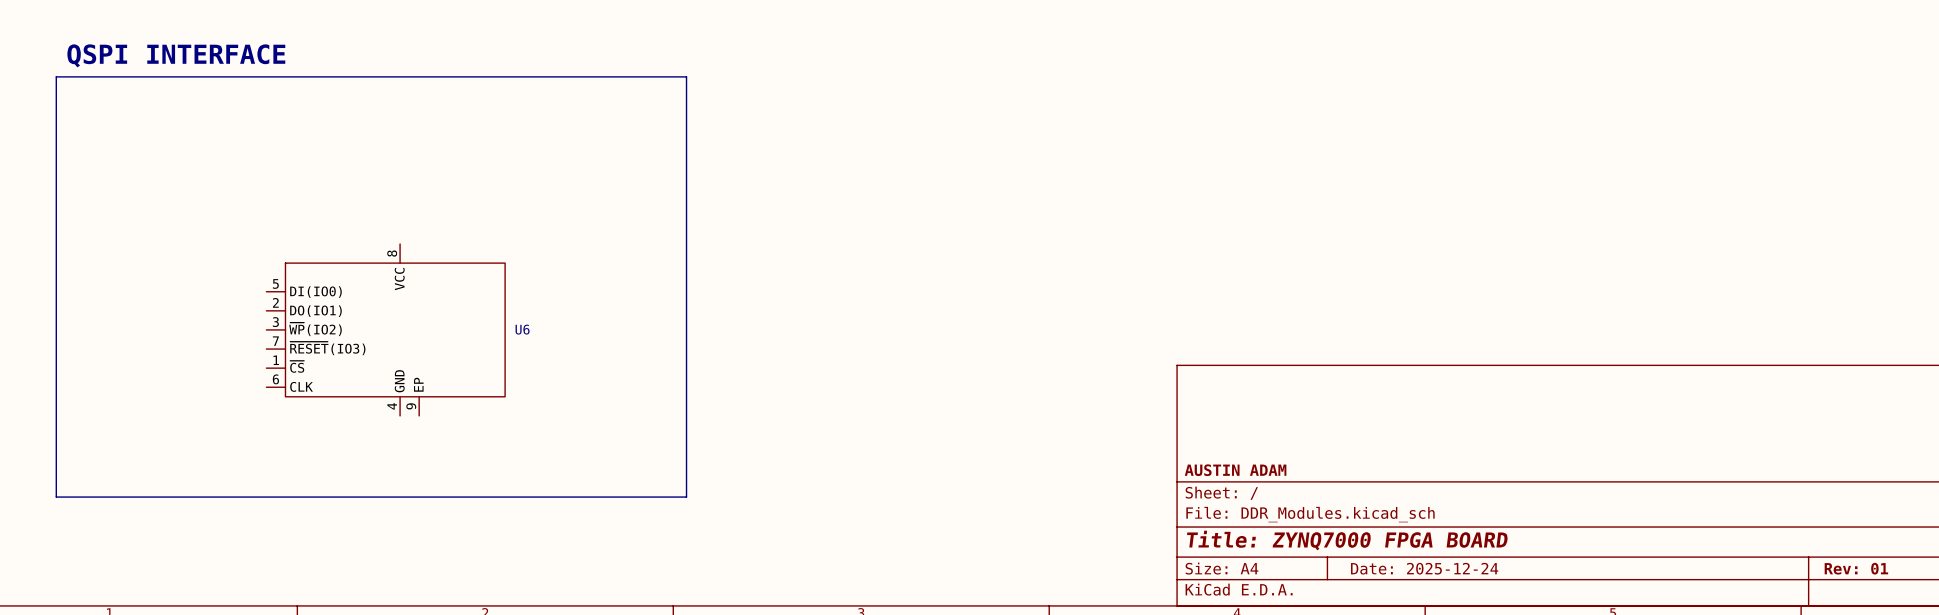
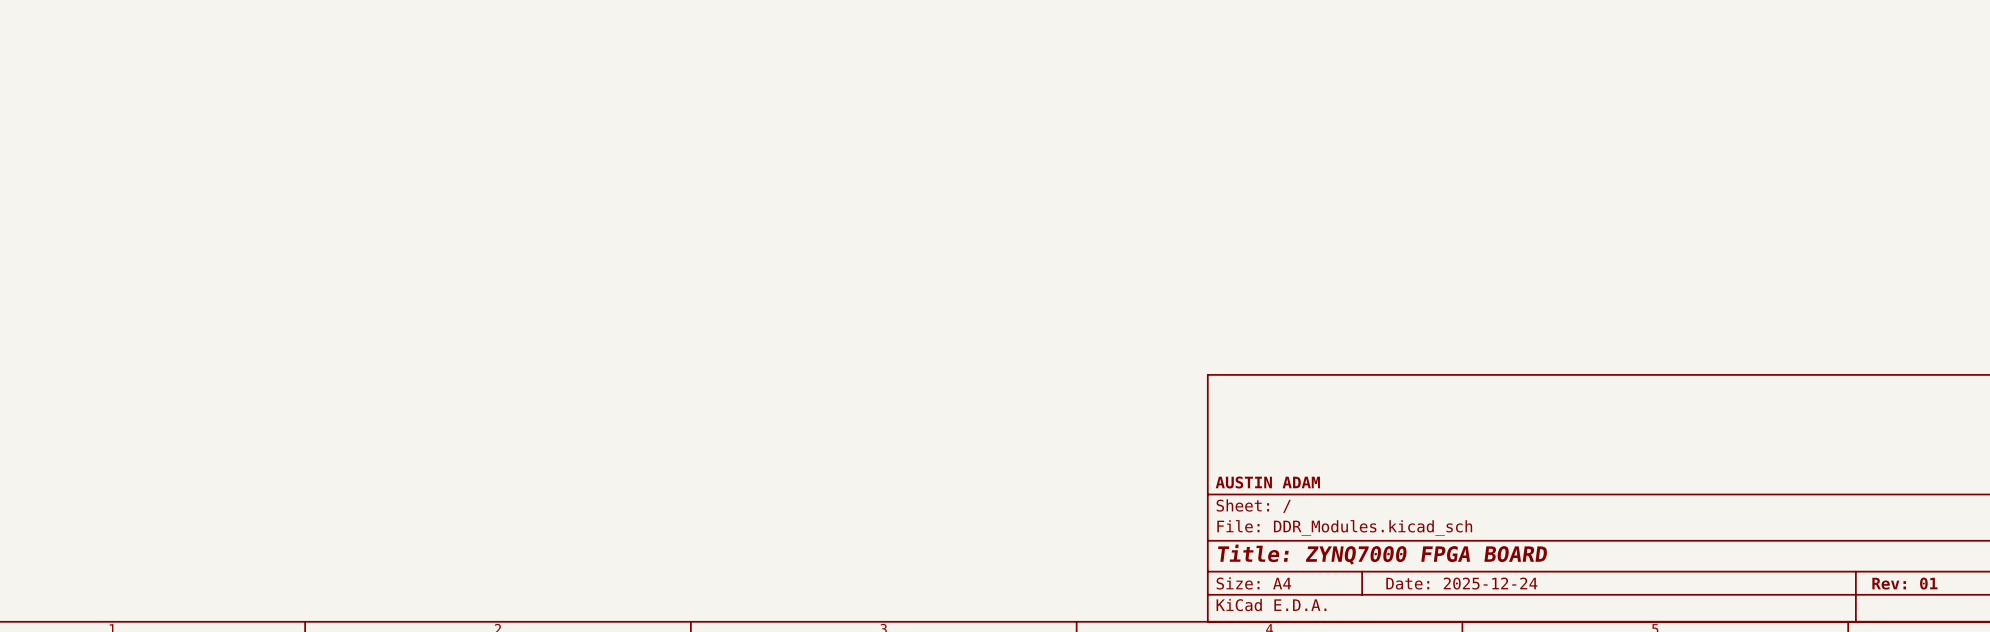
text: QSPI INTERFACE (176, 55) -> none
line: (56, 76) (686, 76) (686, 497) (56, 497) (56, 76) -> none
U6: (385, 329) -> none

